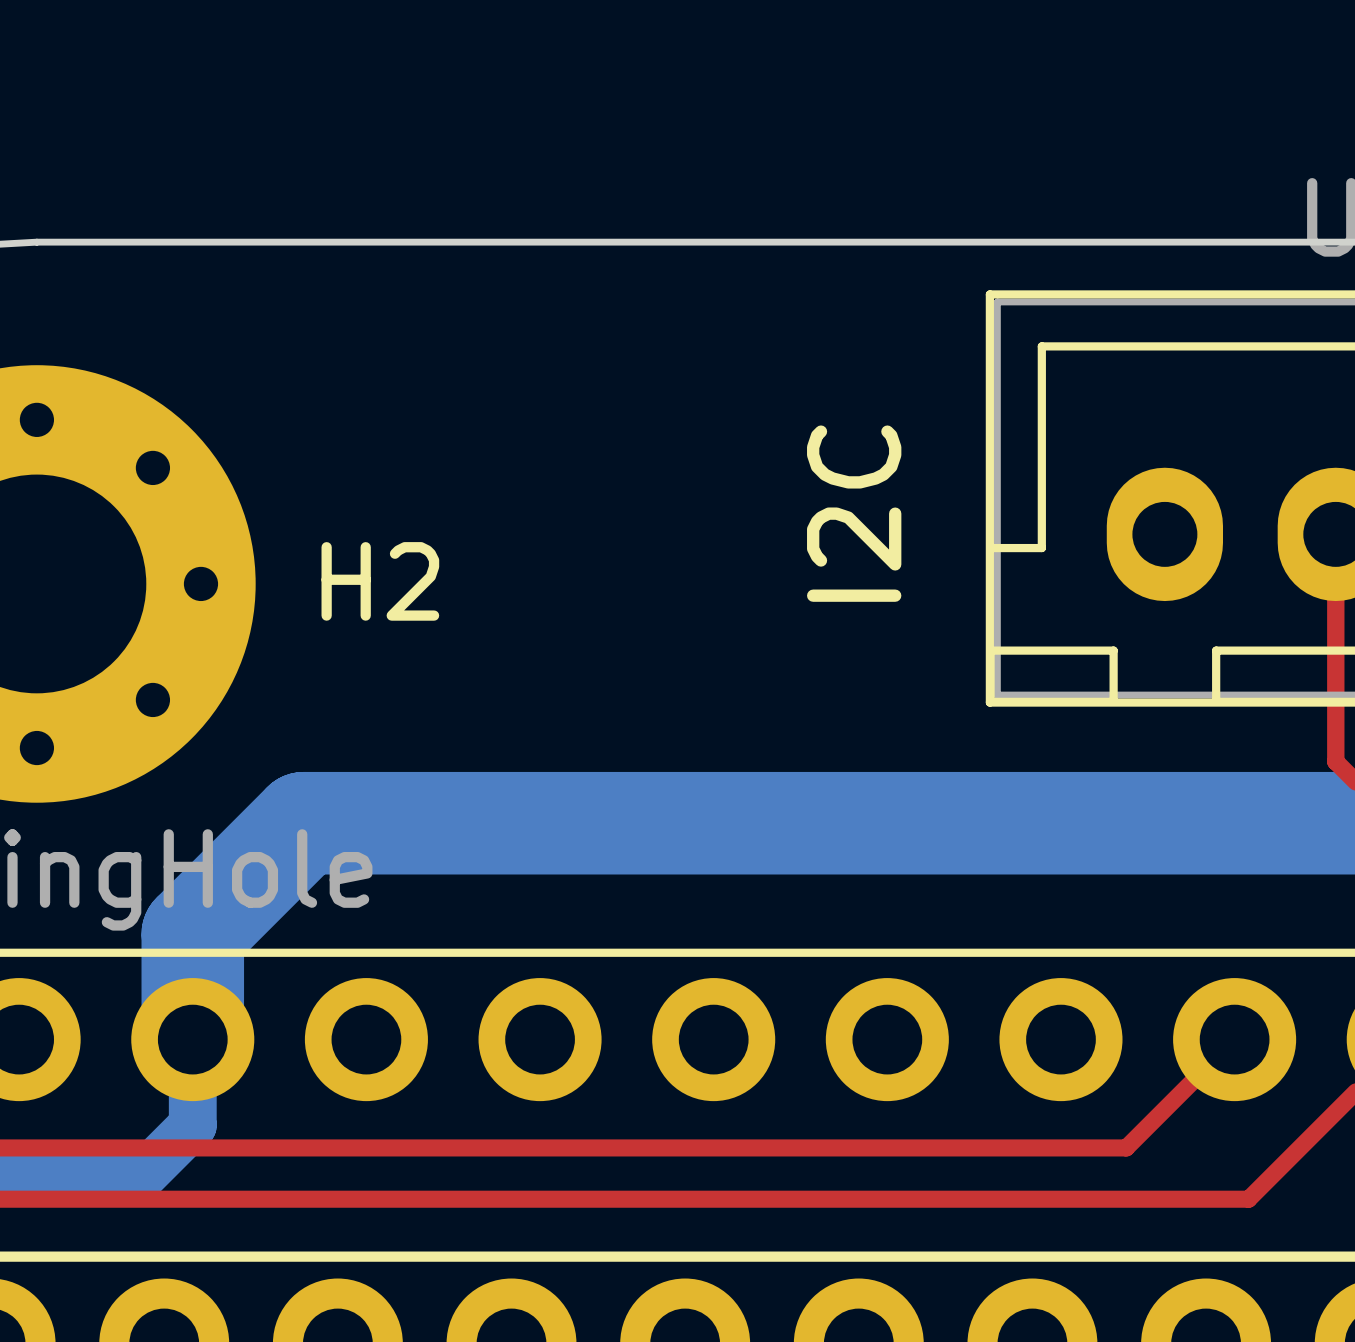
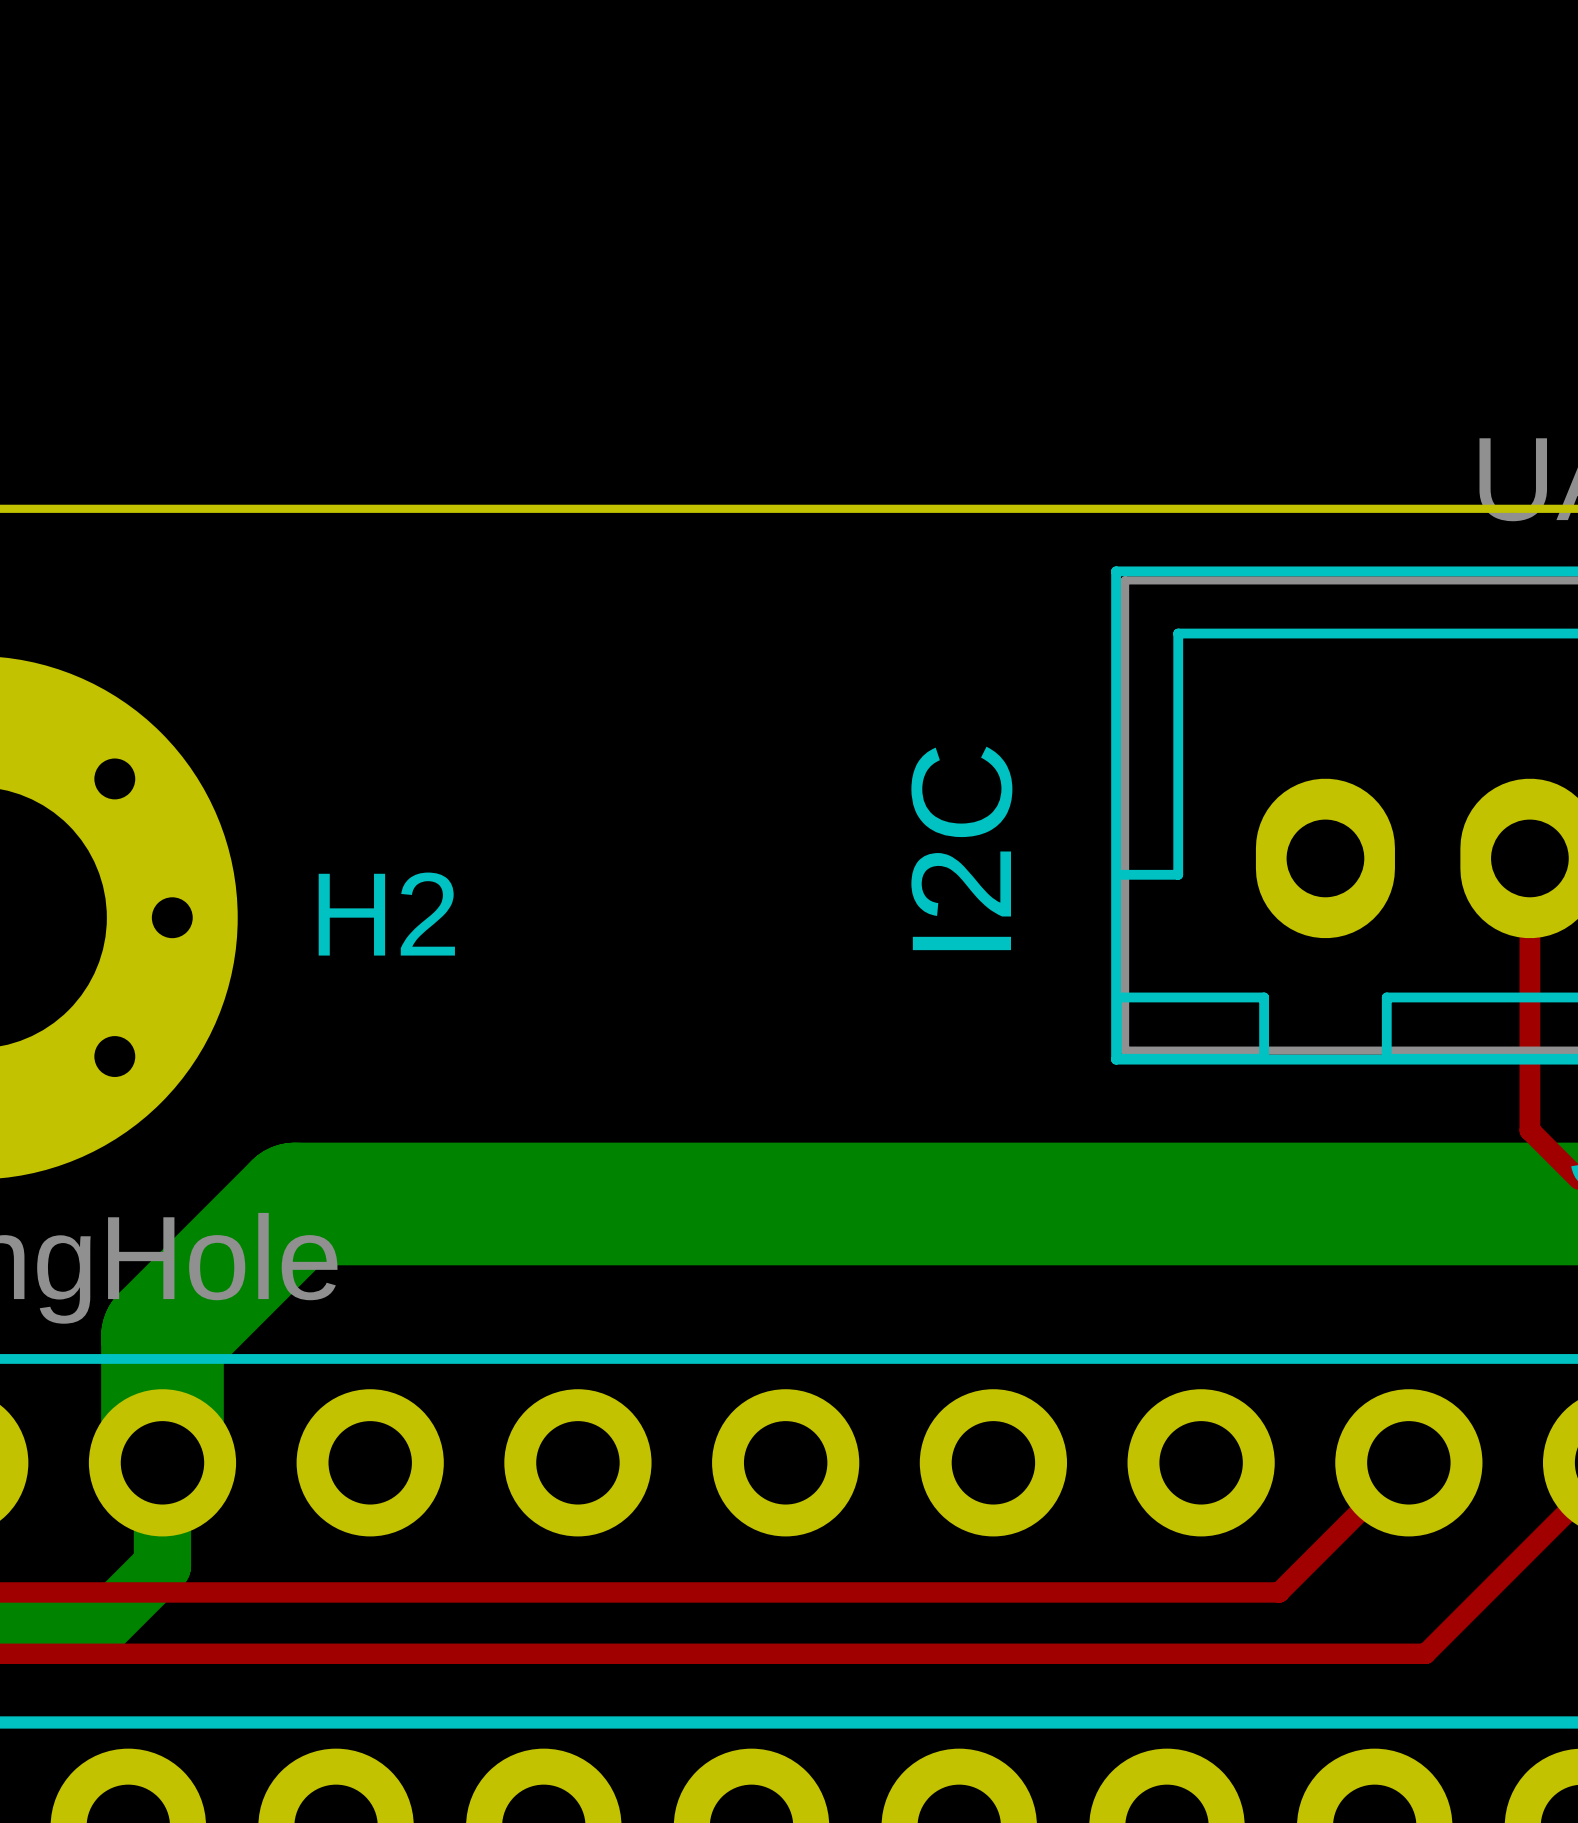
text position: I2C (854, 513) -> I2C (961, 848)

